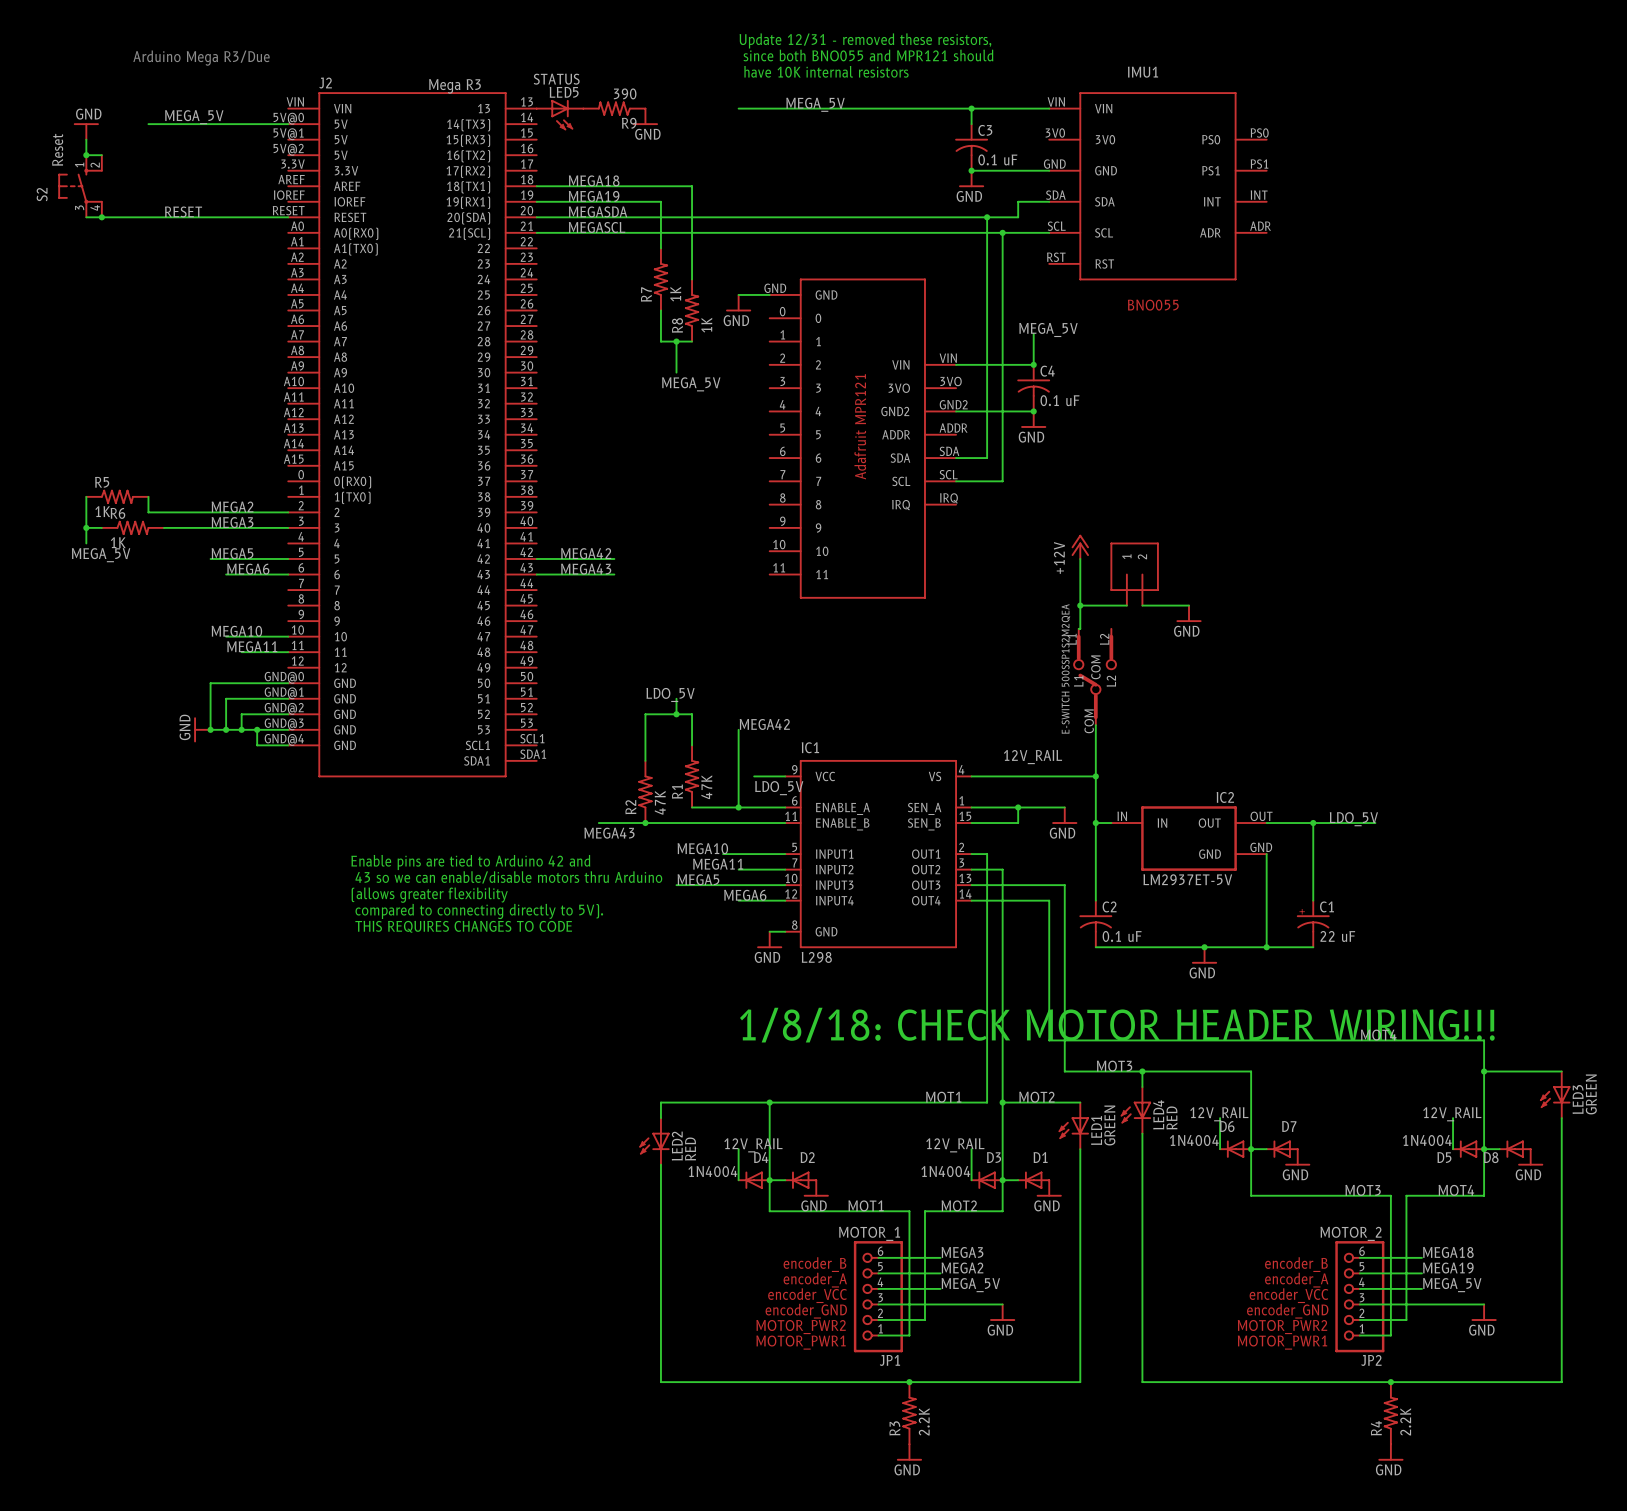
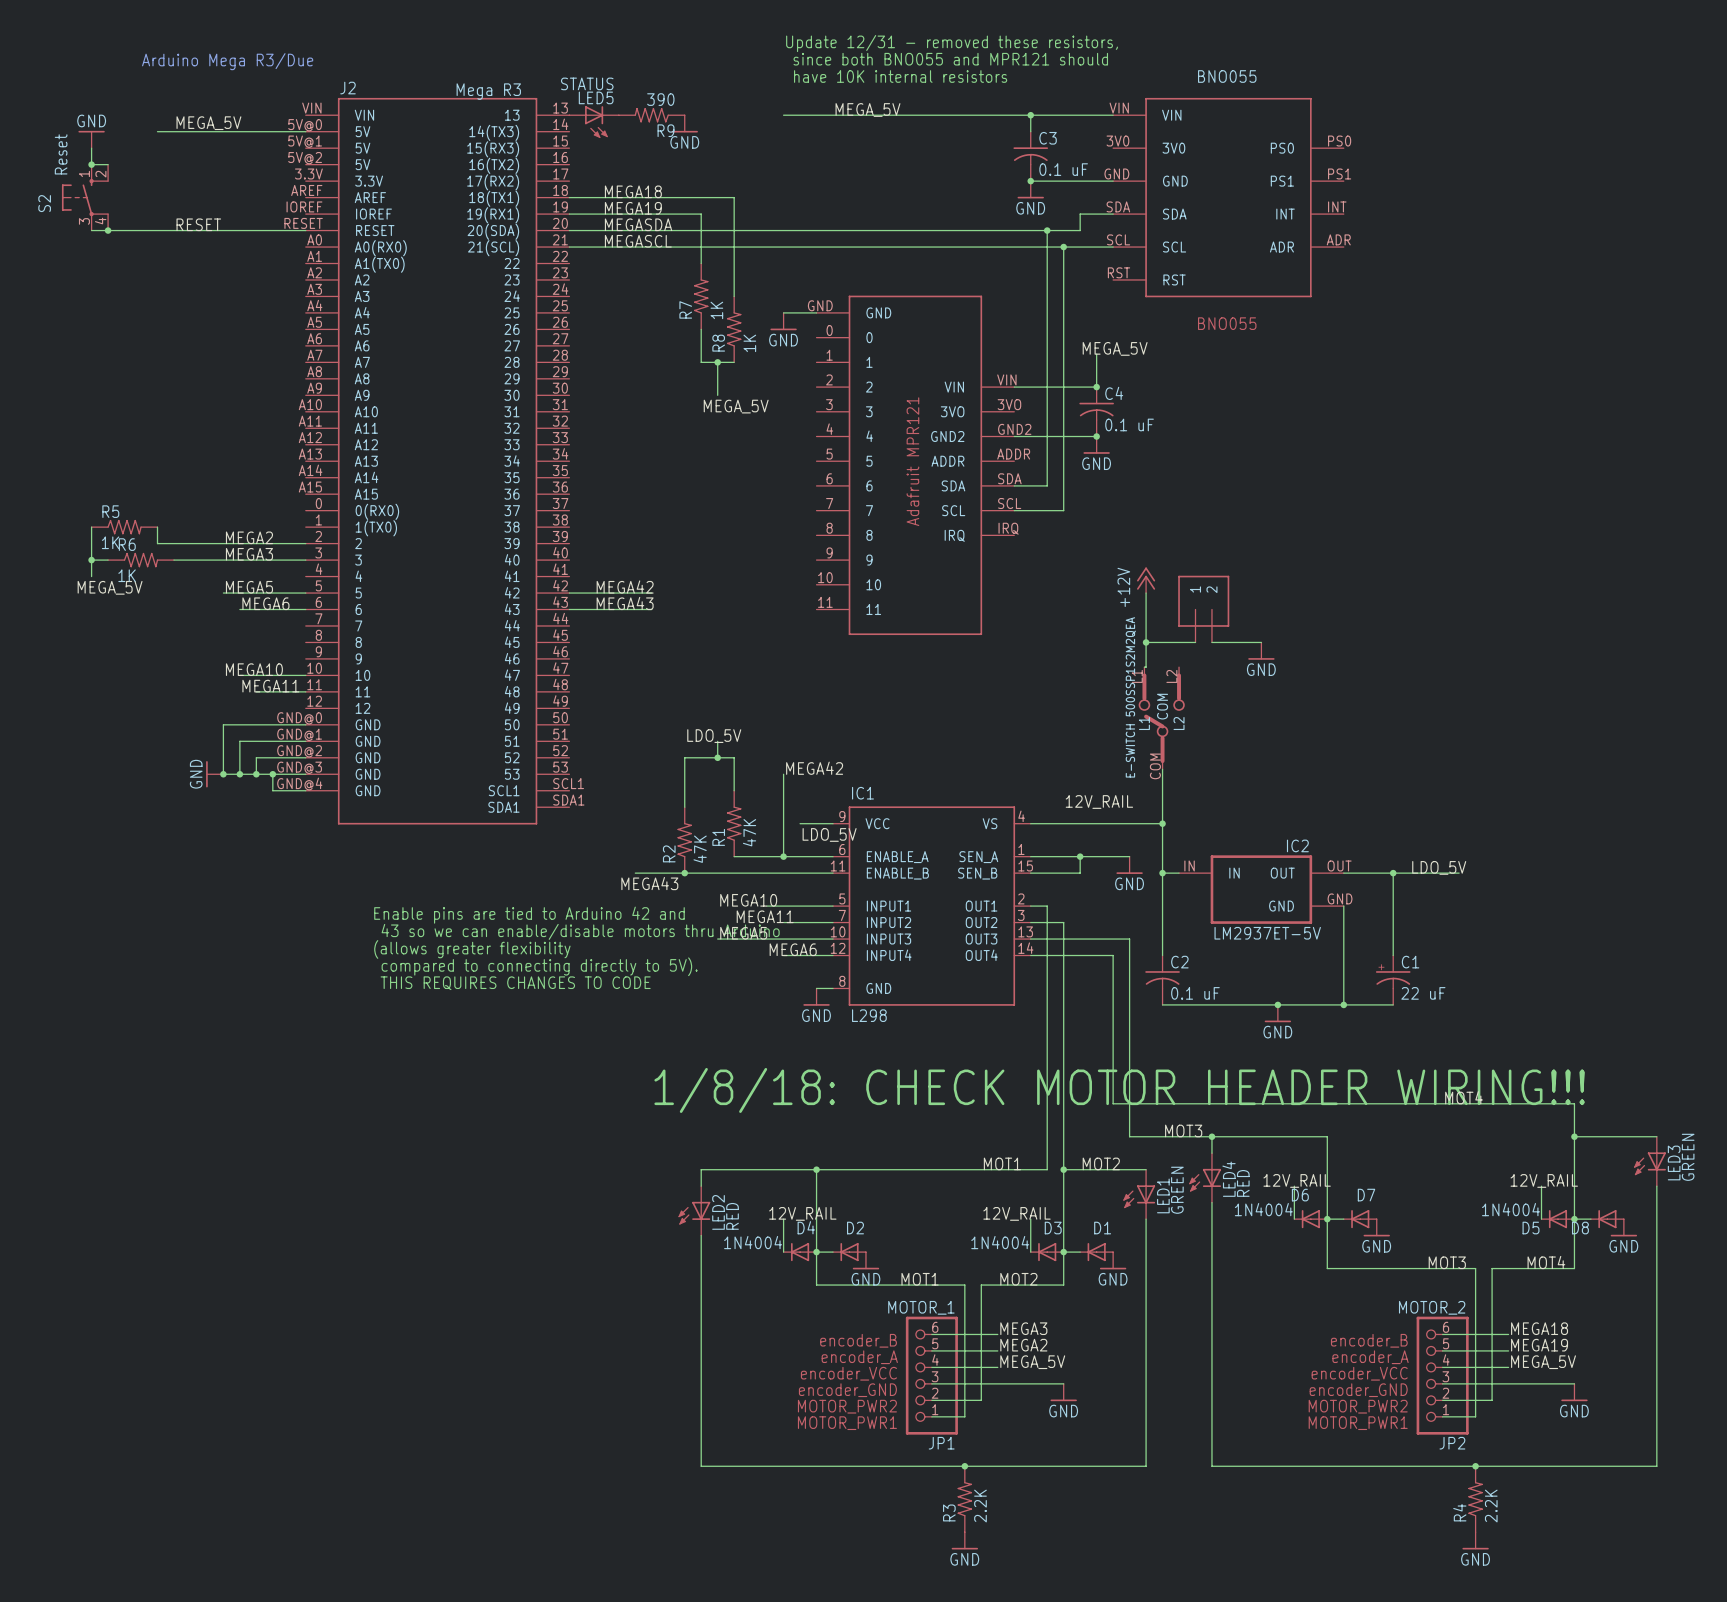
IMU1 name: IMU1 (1143, 72) -> BNO055 (1227, 76)

